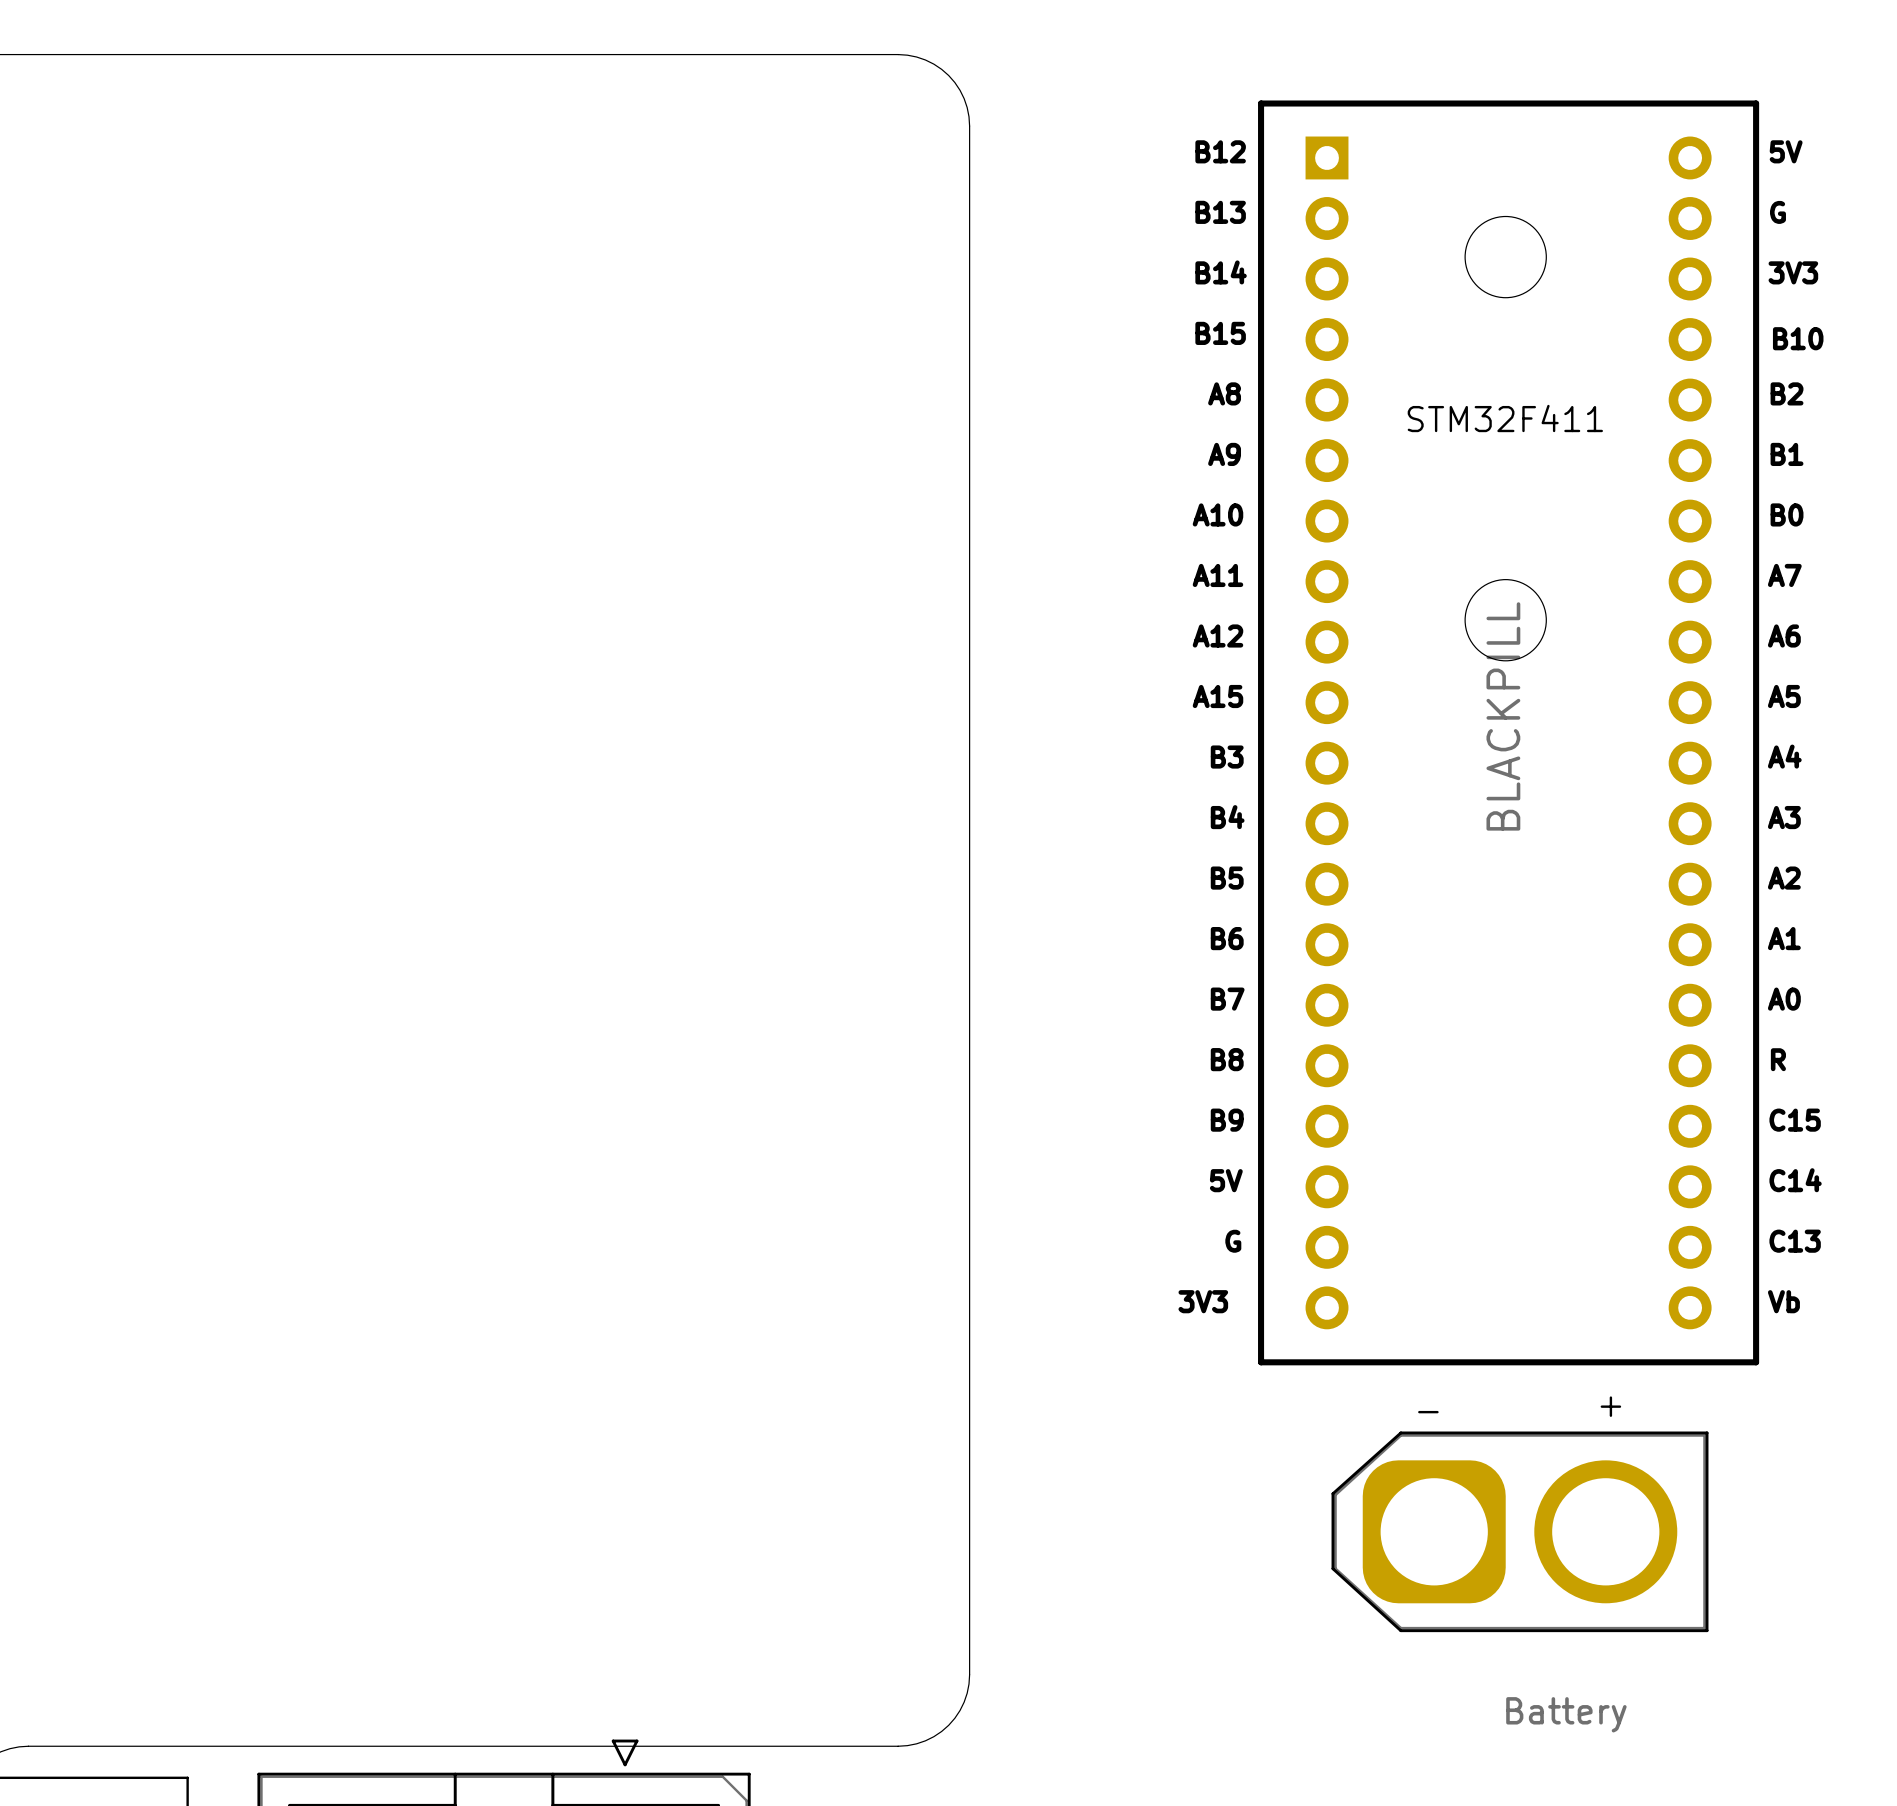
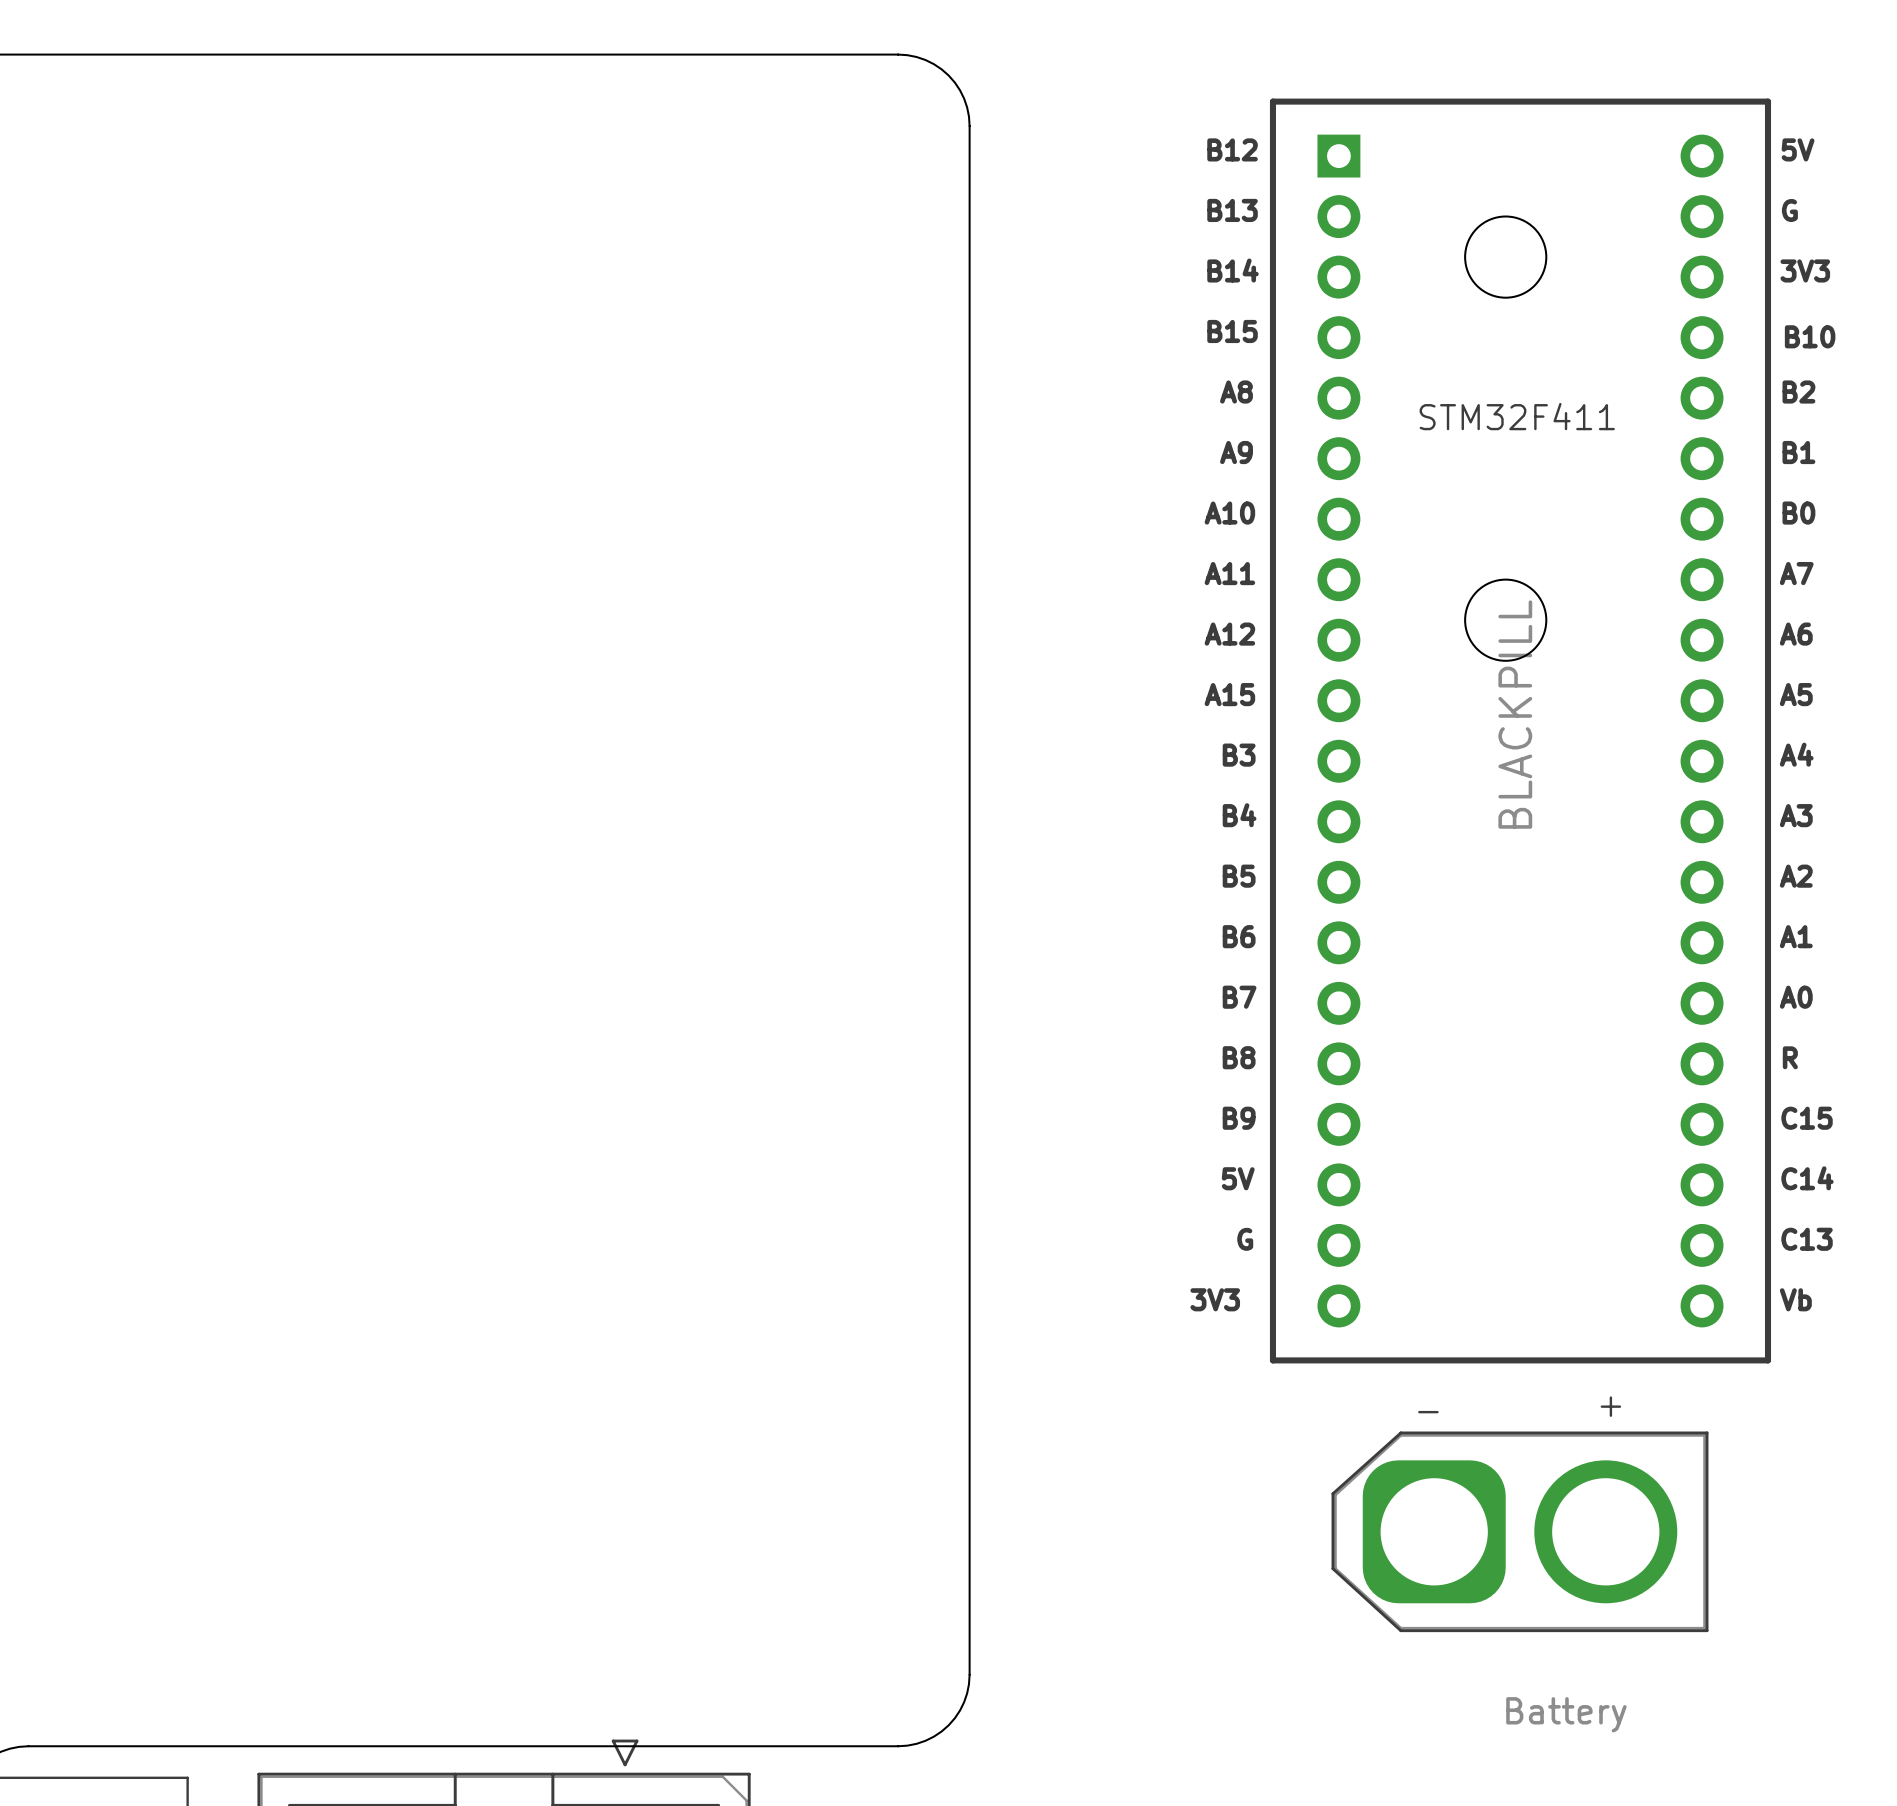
part position: (1508, 732) -> (1520, 731)

